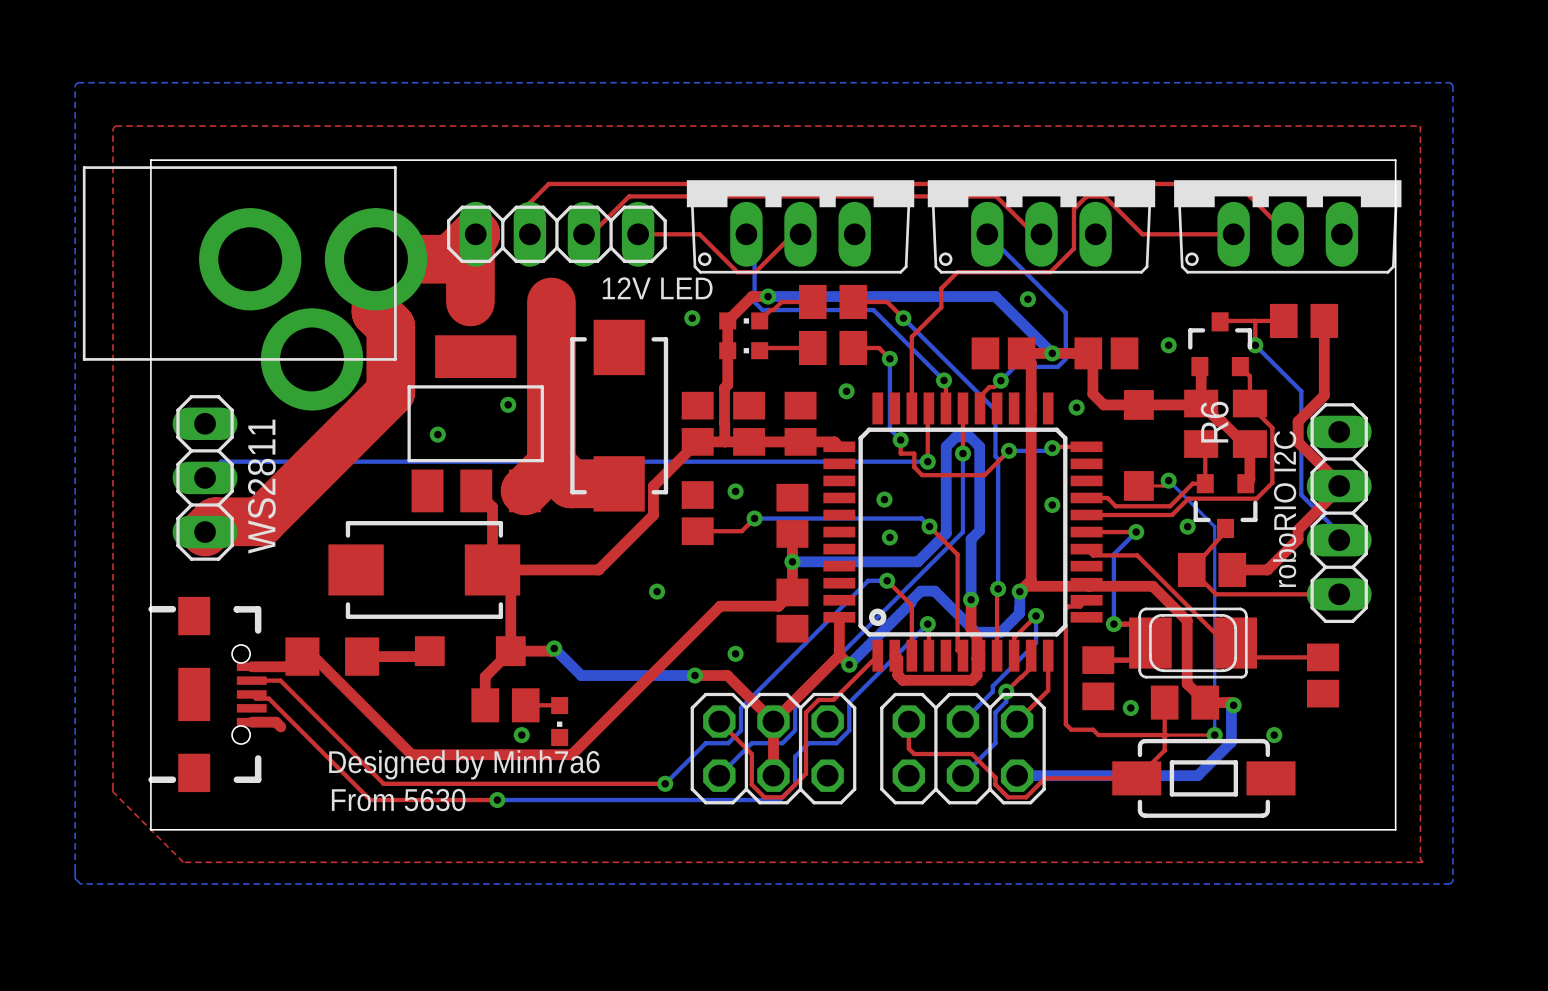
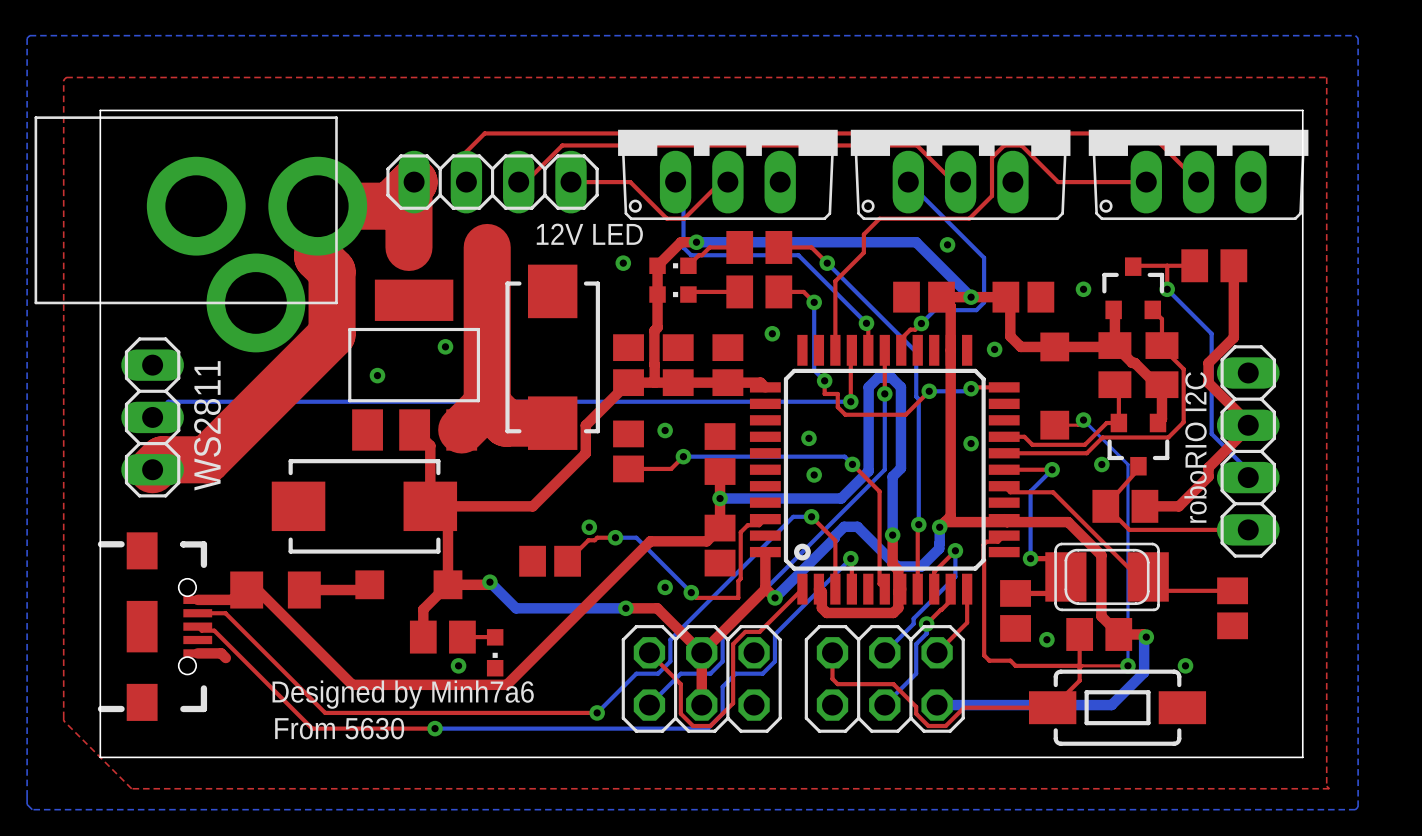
R6 name: R6 (1214, 422) -> none
top track: none -> (765, 519) (759, 525) (747, 525) (740, 532) (740, 578) (738, 580) (738, 597) (696, 597) (691, 592)
top track: none -> (615, 537) (597, 537) (594, 540) (588, 540) (567, 561)
bottom track: none -> (615, 537) (636, 537) (691, 592)
via: none -> (615, 537)
part: none -> (550, 561)
via: none -> (691, 592)

